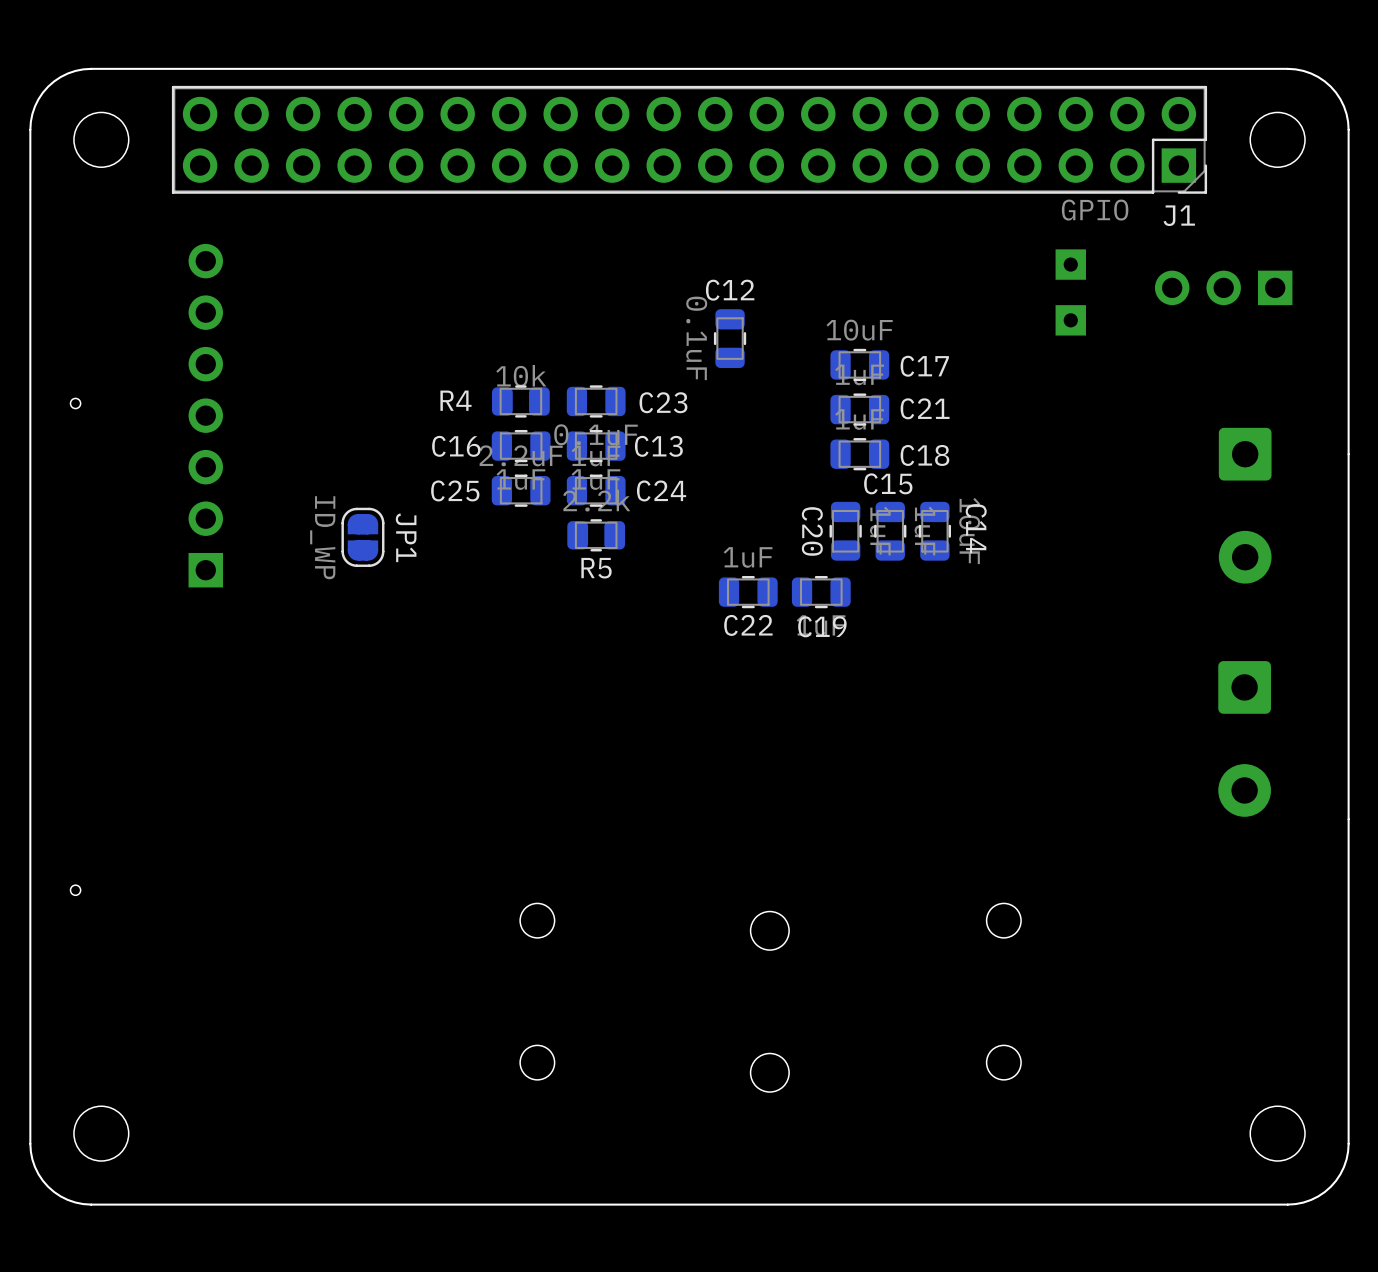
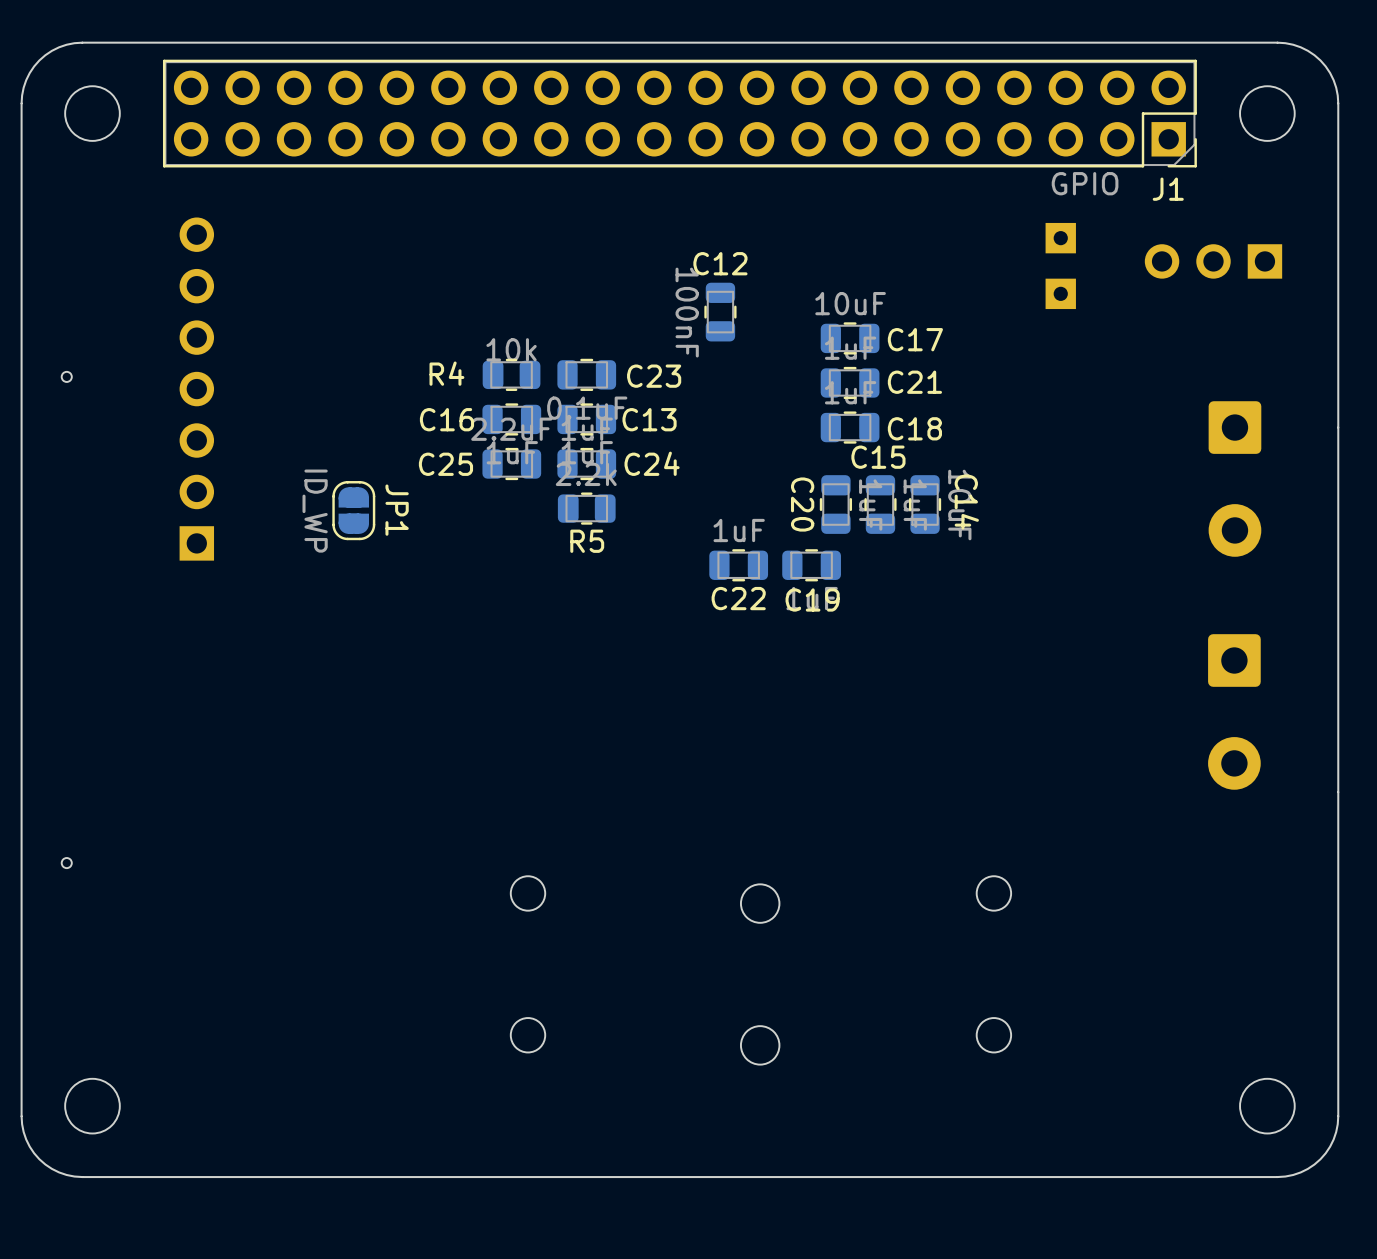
C12 value: 0.1uF (696, 338) -> 100nF (687, 312)

